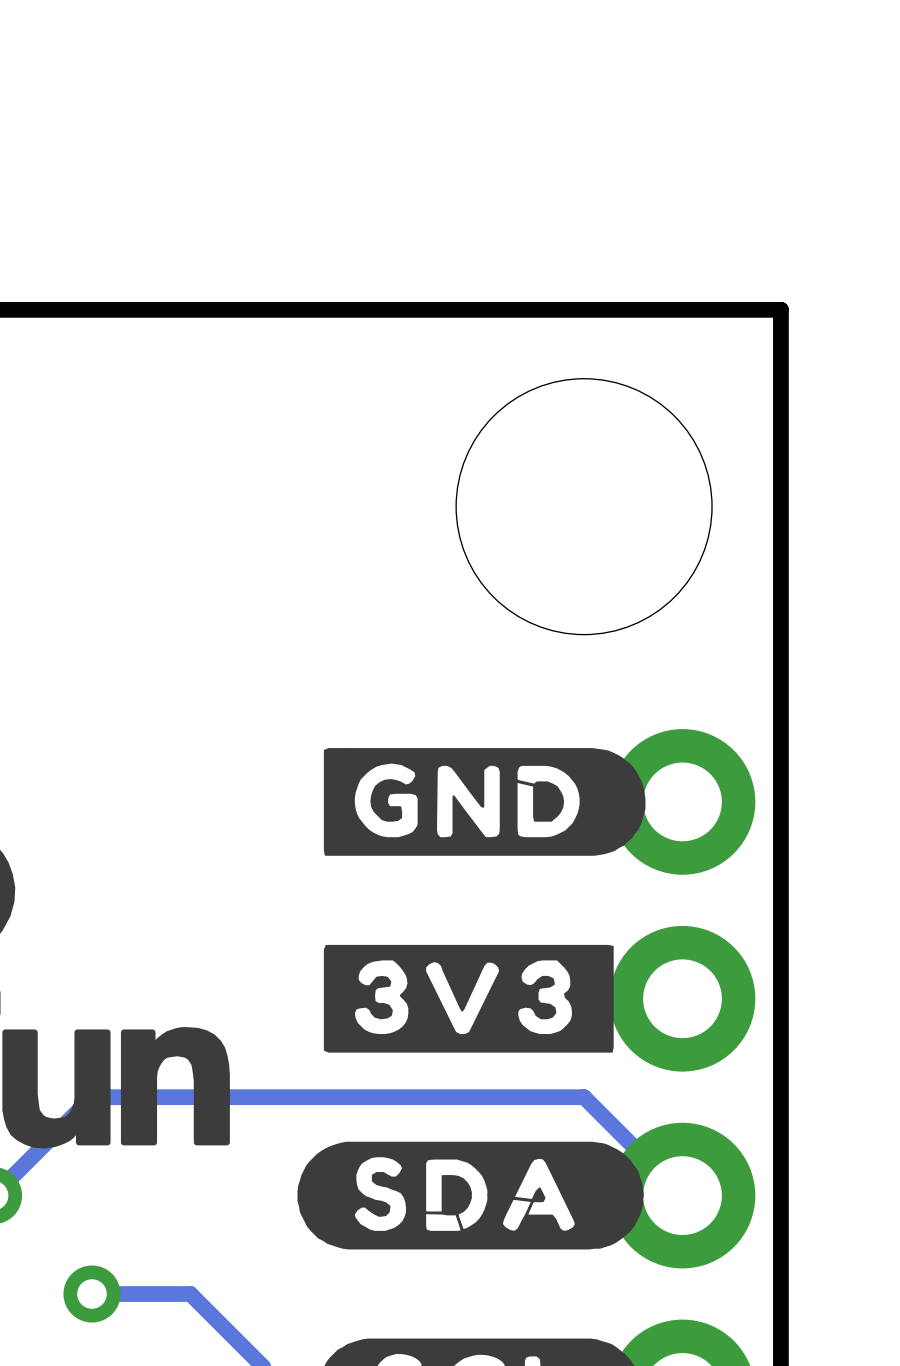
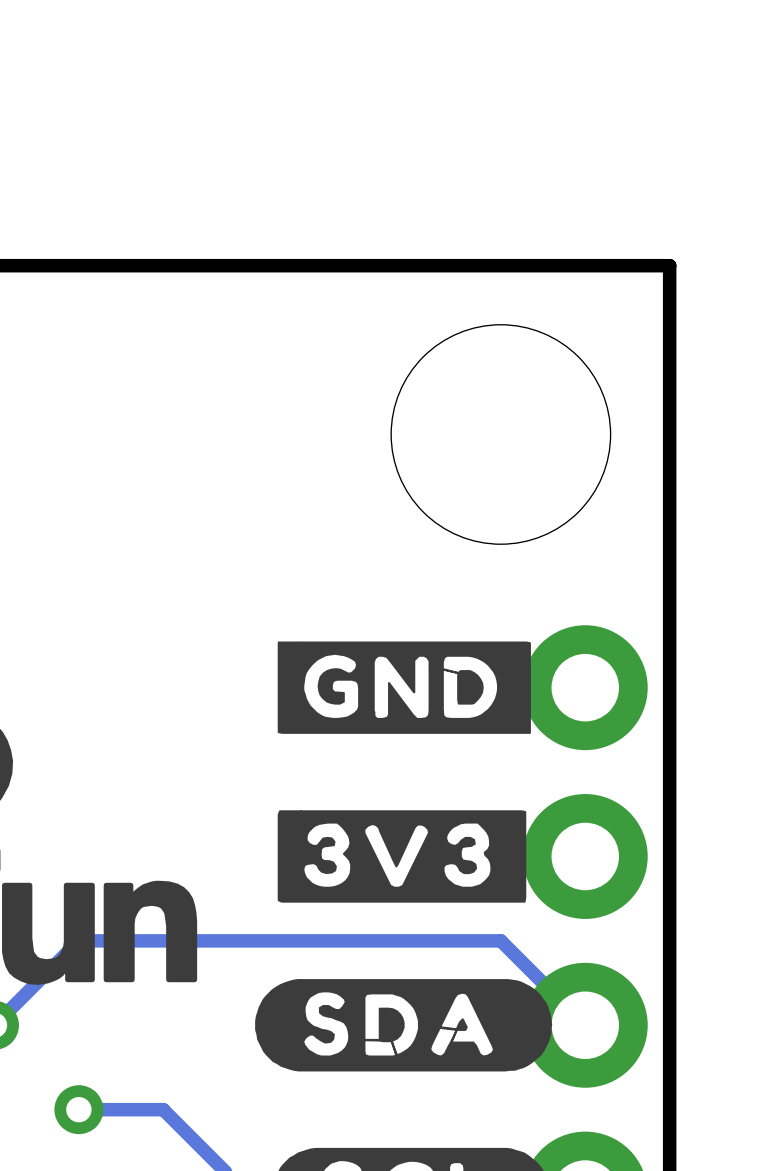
drawing shape: [323, 748, 646, 856] -> [277, 641, 531, 734]

